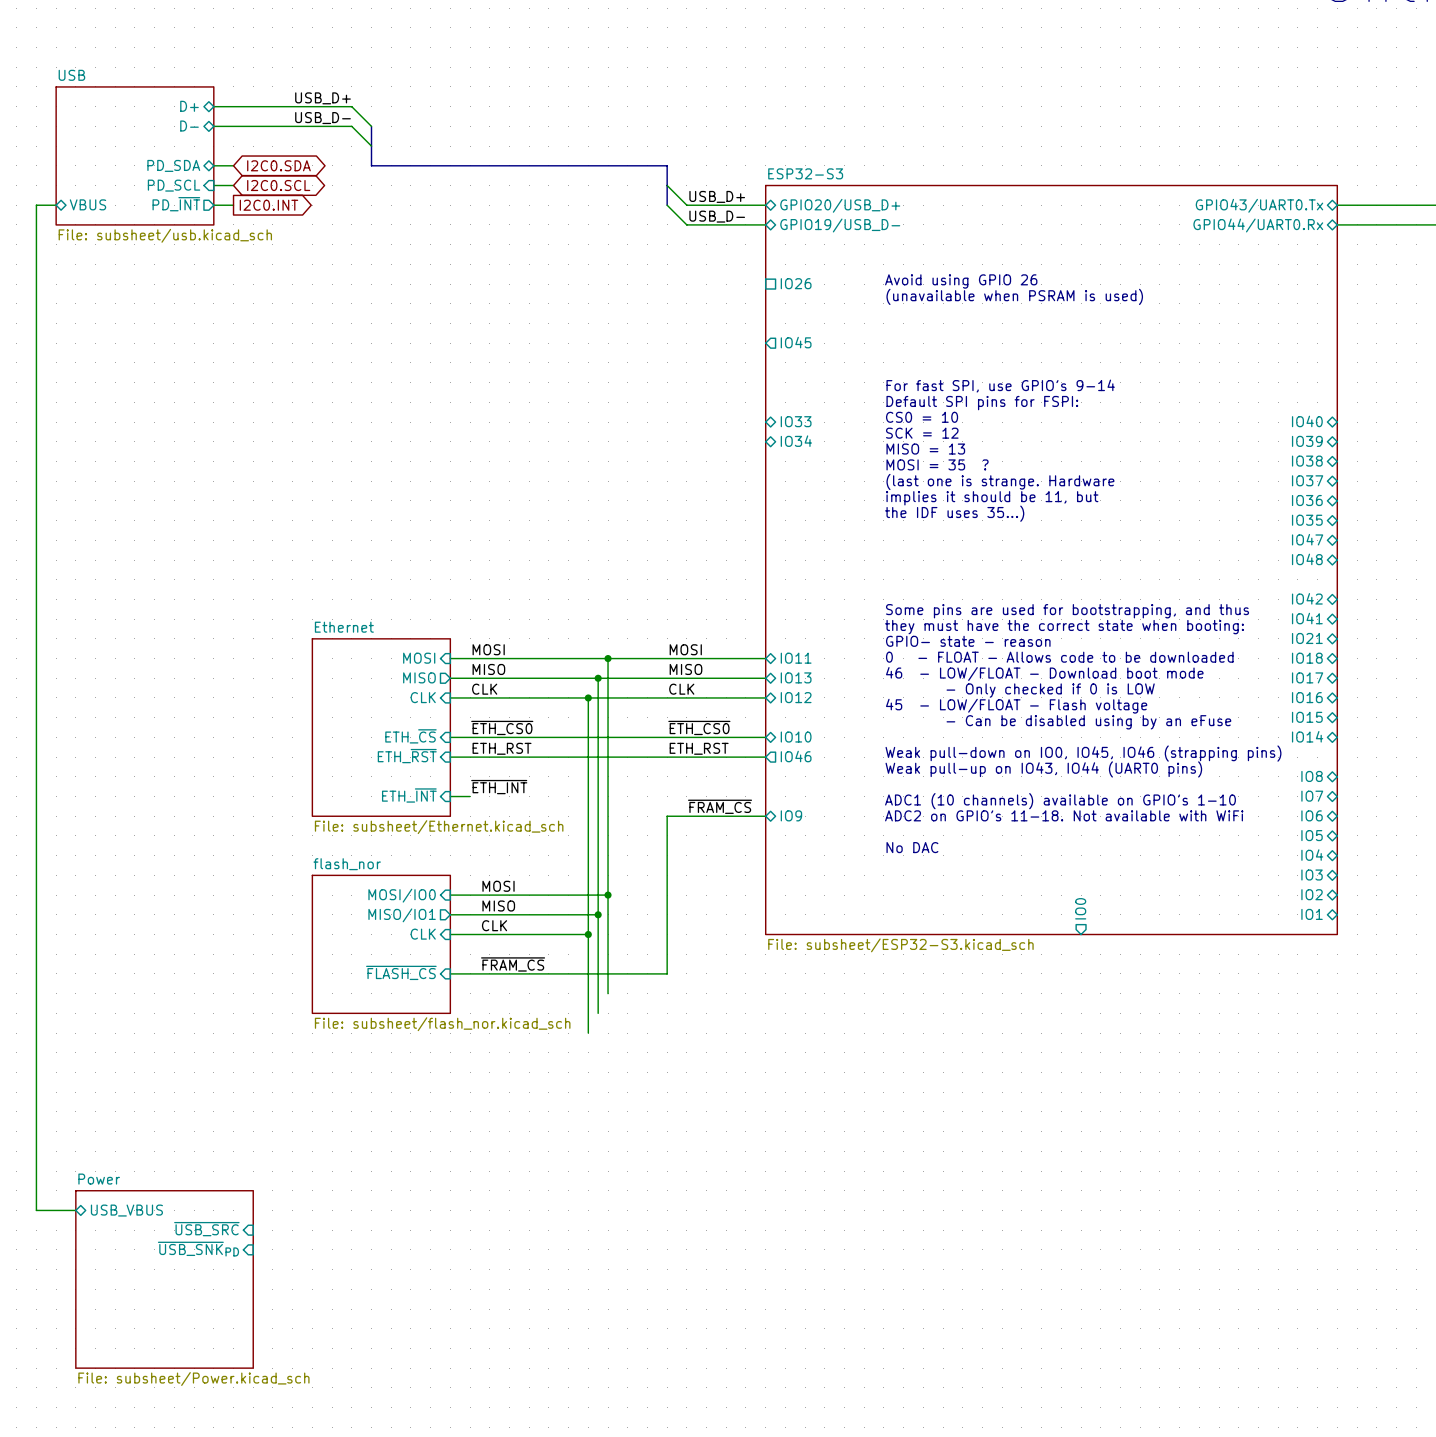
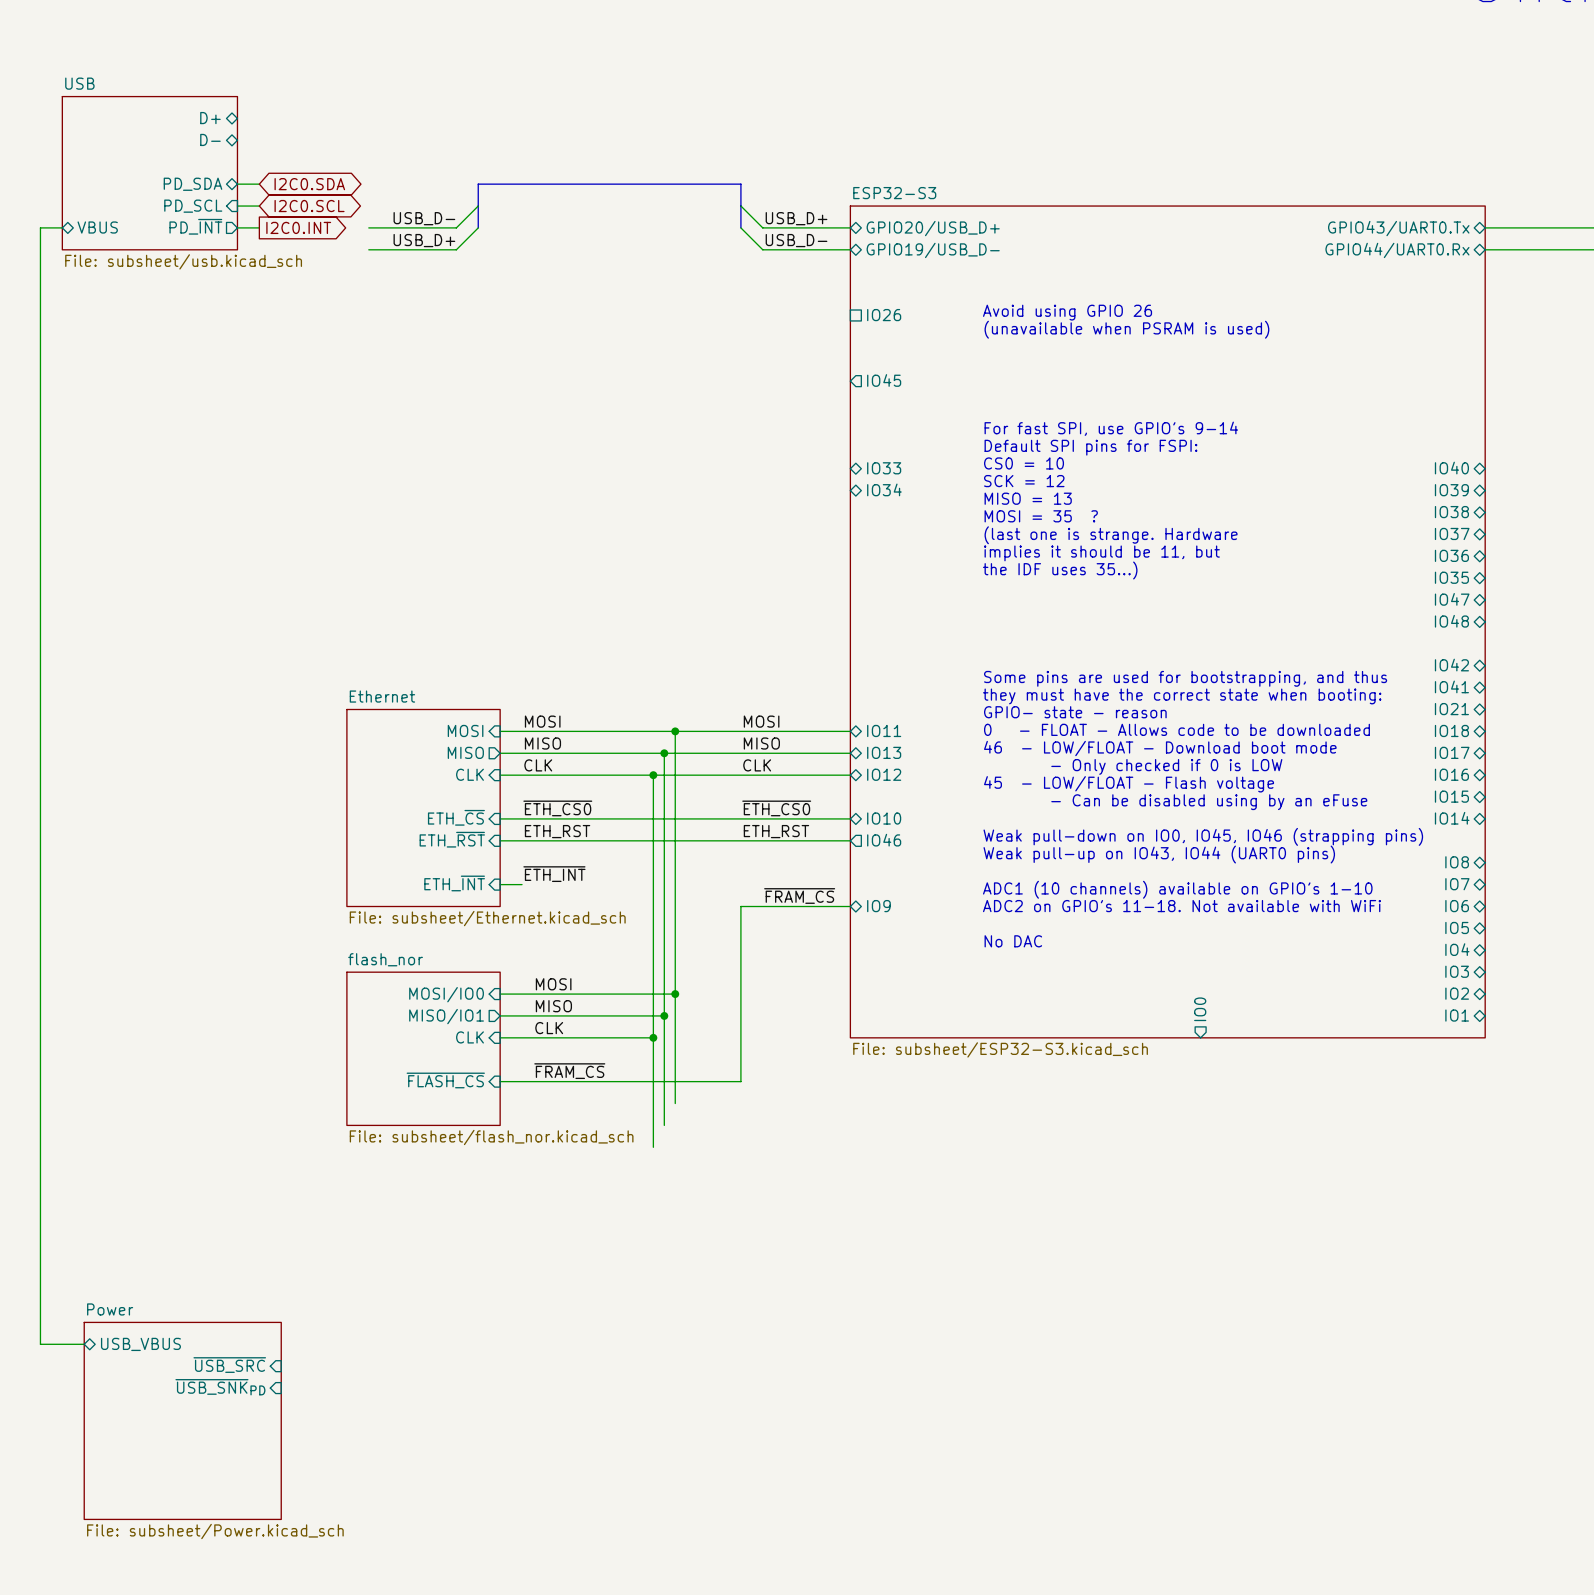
label position: USB_D+ (323, 98) -> USB_D+ (424, 240)
wire: (213, 106) (351, 106) (371, 126) -> none
label position: USB_D- (323, 118) -> USB_D- (424, 218)
wire: (213, 126) (351, 126) (371, 146) -> none
bus: (371, 126) (371, 165) (430, 165) -> (478, 227) (478, 184)
wire: none -> (478, 206) (456, 227) (368, 227)
wire: none -> (478, 227) (456, 249) (368, 249)

